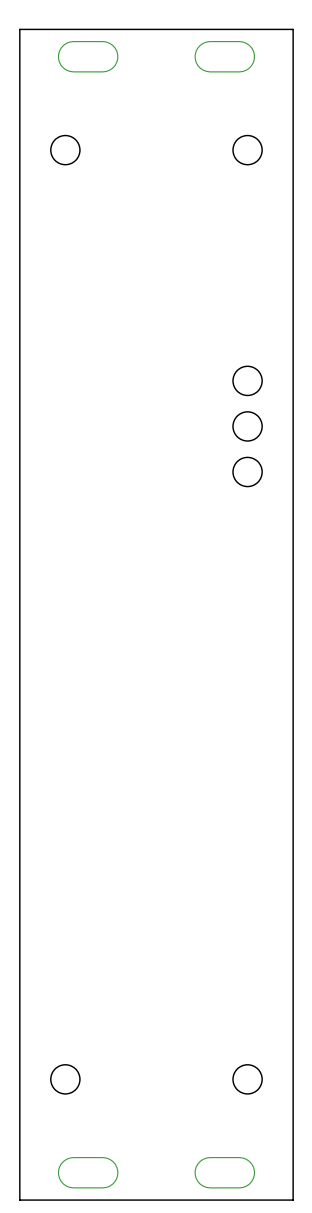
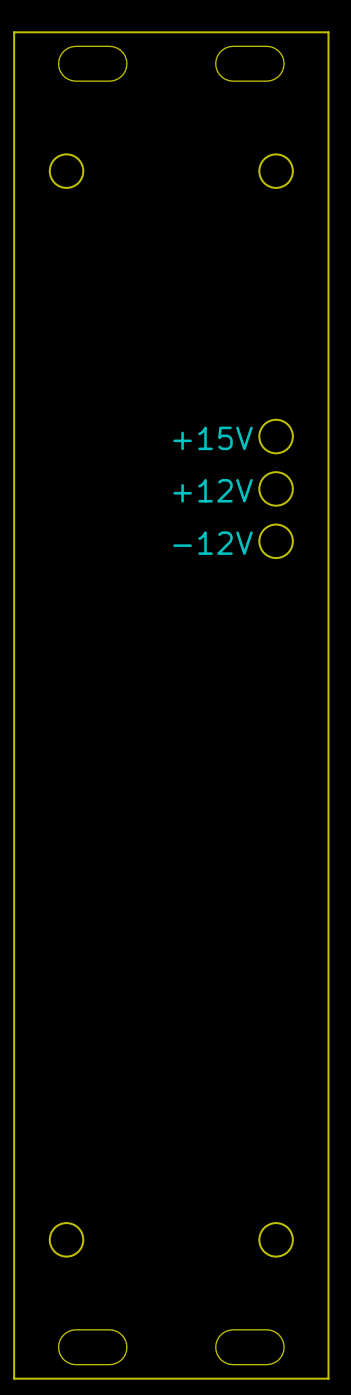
text: none -> +15V (213, 438)
text: none -> +12V (213, 490)
text: none -> -12V (213, 543)

